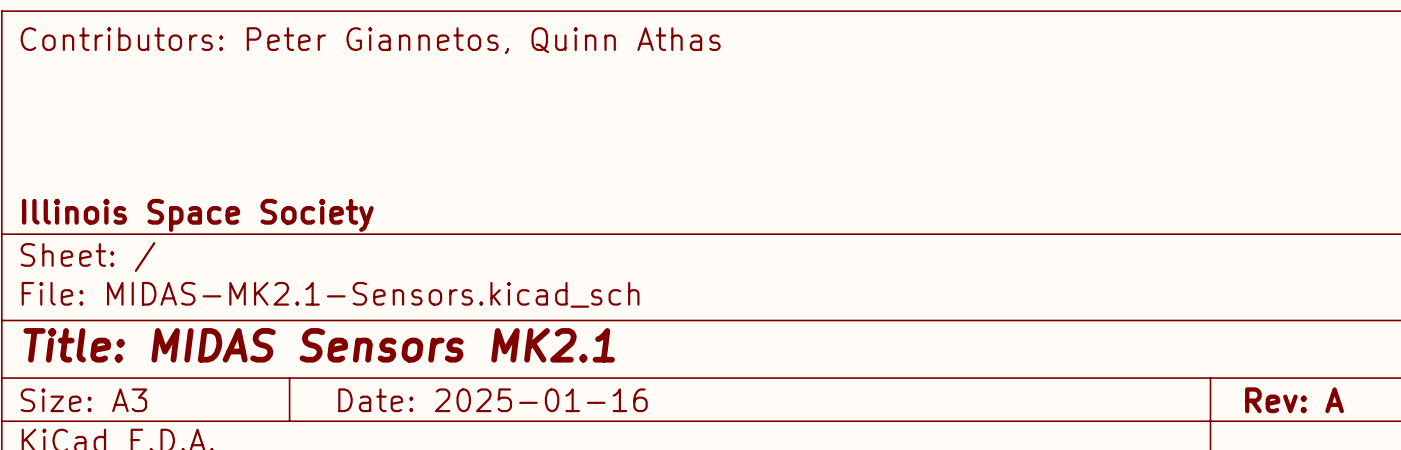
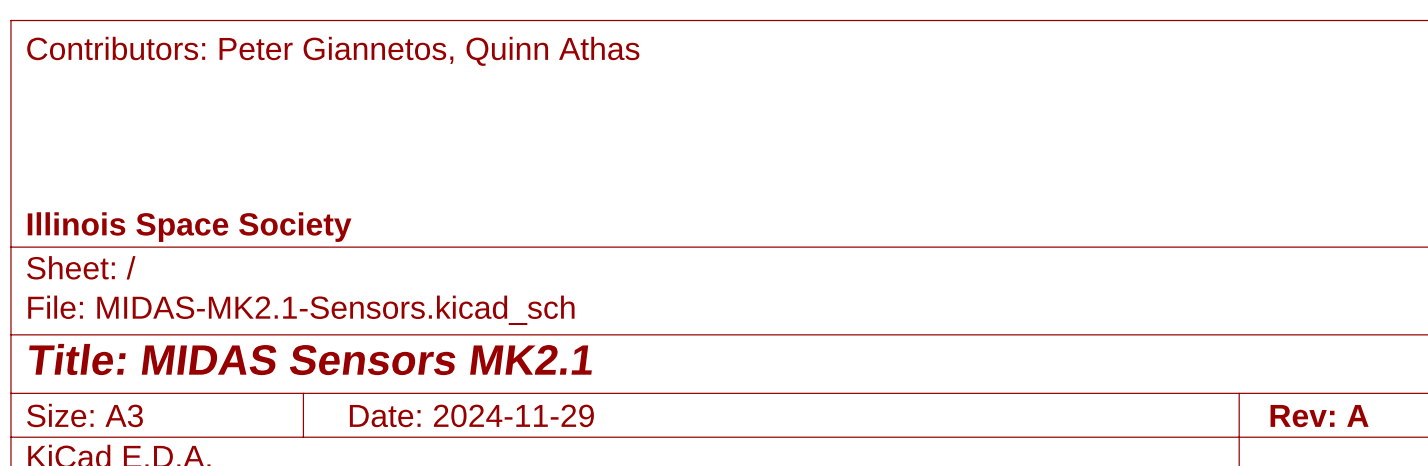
title block: Date: 2025-01-16 (492, 400) -> Date: 2024-11-29 (471, 415)

